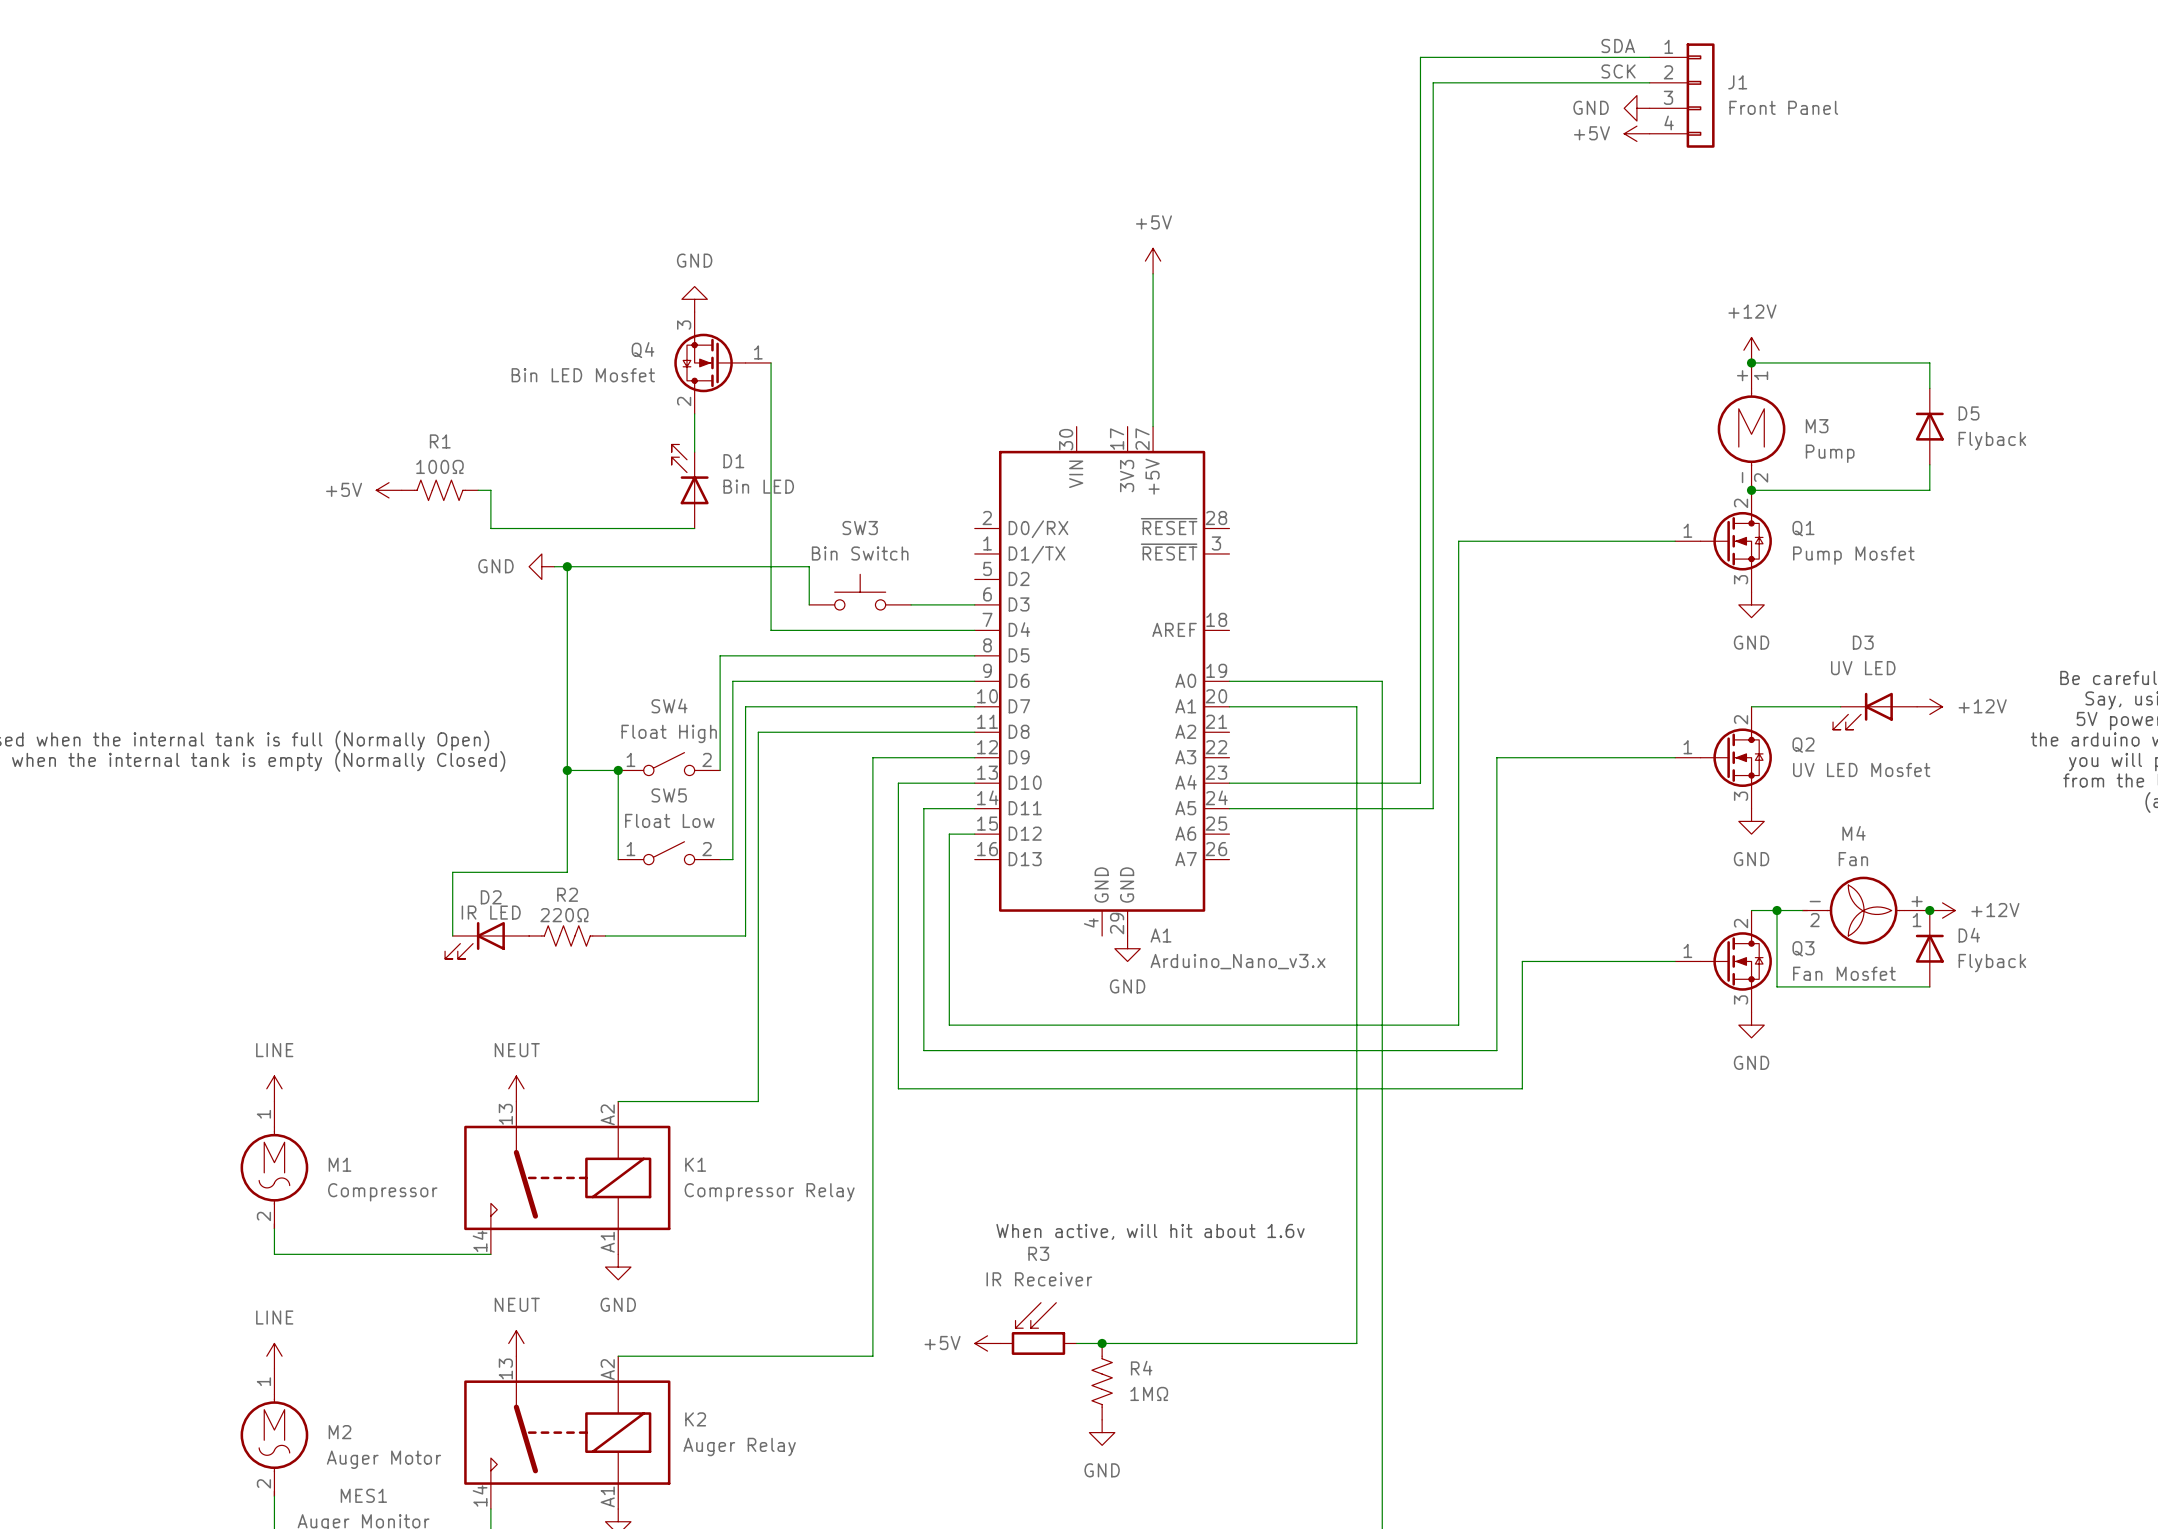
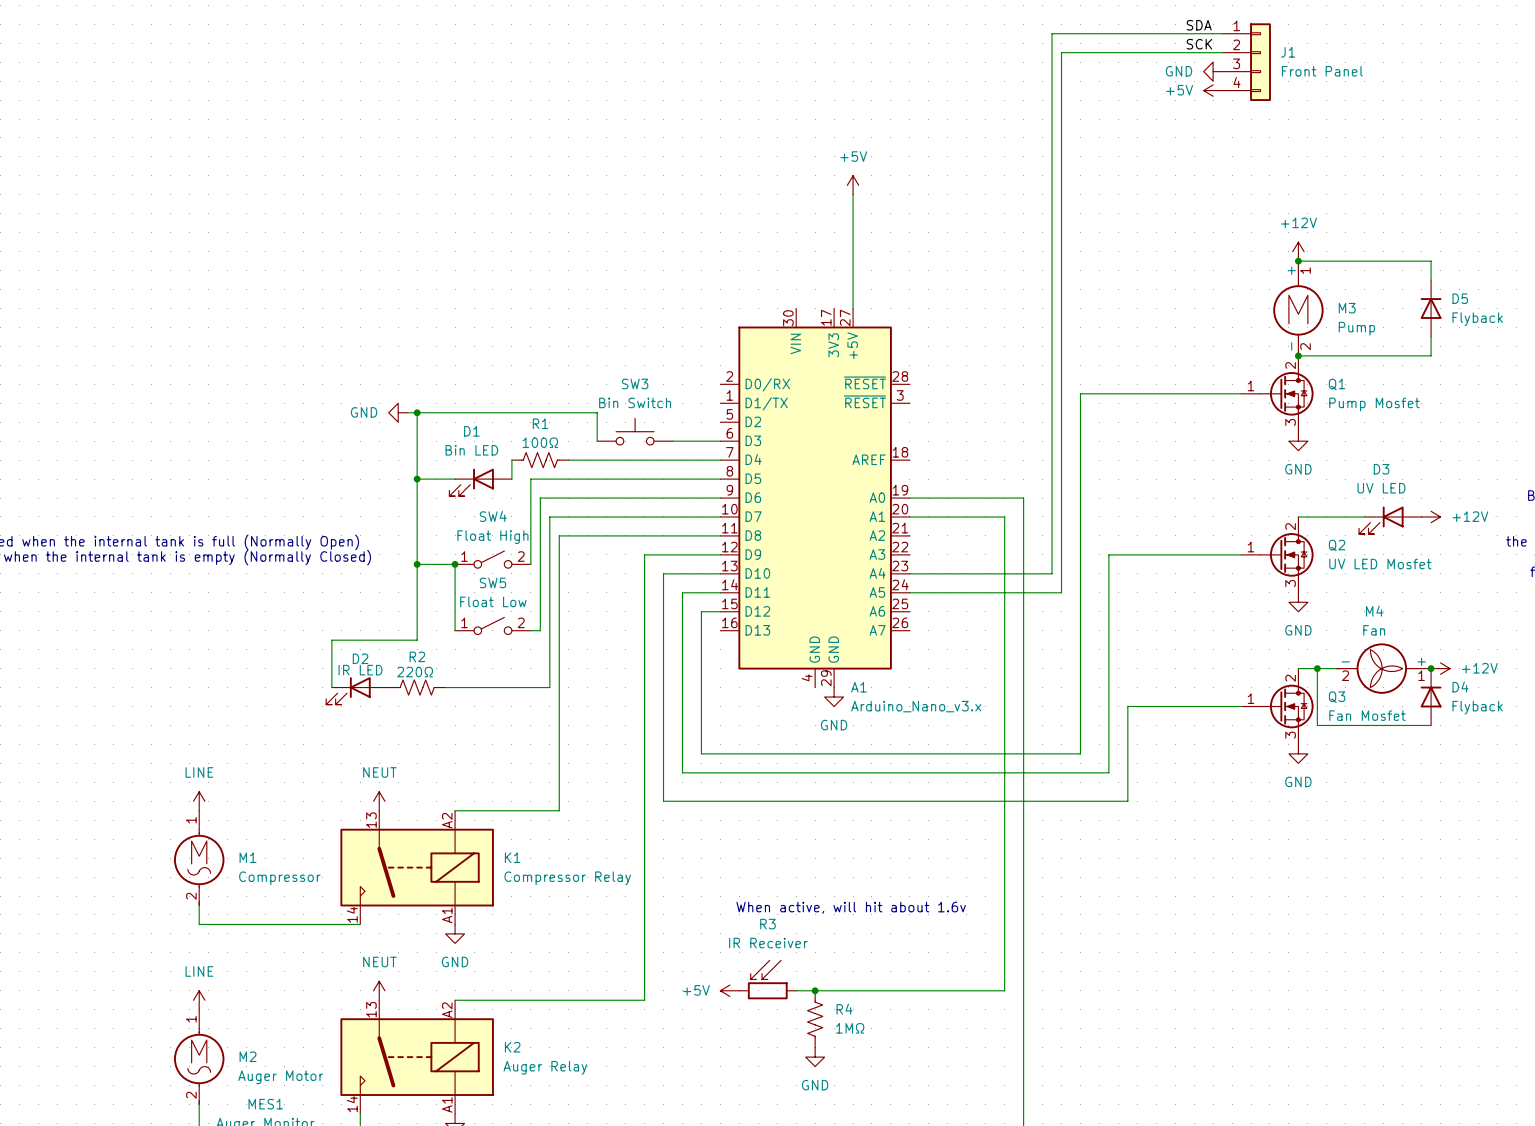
power symbol: GND (694, 299) -> none
Q4: Bin LED Mosfet (722, 362) -> none
wire: (771, 362) (771, 630) -> none
wire: (694, 413) (694, 452) -> none
D1 name position: D1 (733, 461) -> D1 (471, 431)
D1 rotation: 0° (690, 474) -> 90° counterclockwise (471, 482)
D1 position: (690, 486) -> (480, 482)
D1 value position: Bin LED (758, 486) -> Bin LED (471, 450)
power symbol: +5V (389, 490) -> none
R1 position: (439, 490) -> (540, 460)
wire: (478, 490) (490, 490) (490, 528) (694, 528) -> none
wire: none -> (511, 460) (511, 479)
wire: none -> (417, 479) (455, 479)
junction: none -> (417, 479)

